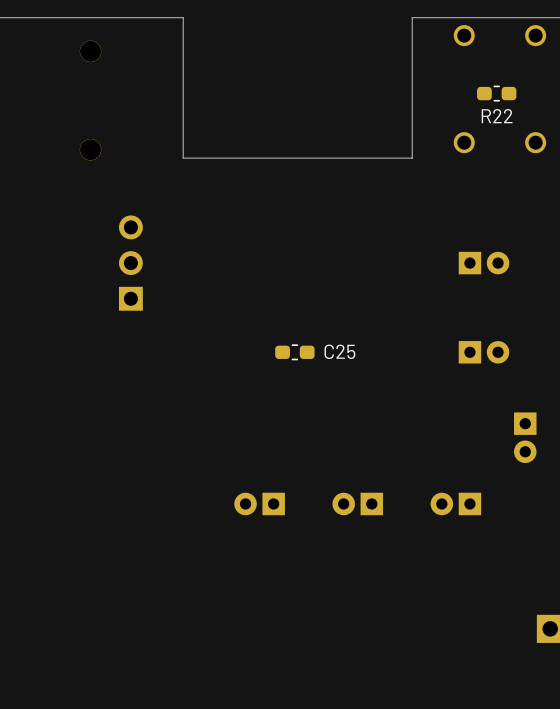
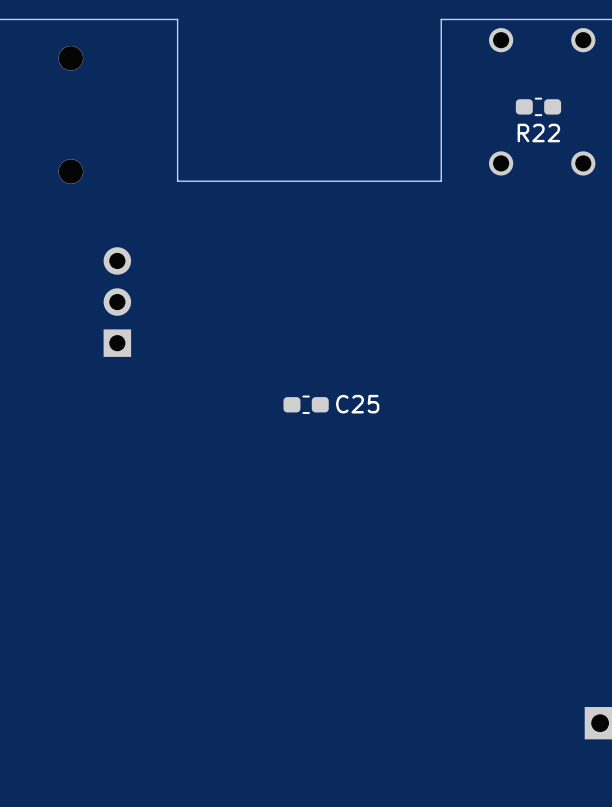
part: (484, 263) -> none
part: (484, 352) -> none
part: (525, 437) -> none
part: (259, 503) -> none
part: (357, 503) -> none
part: (455, 503) -> none

